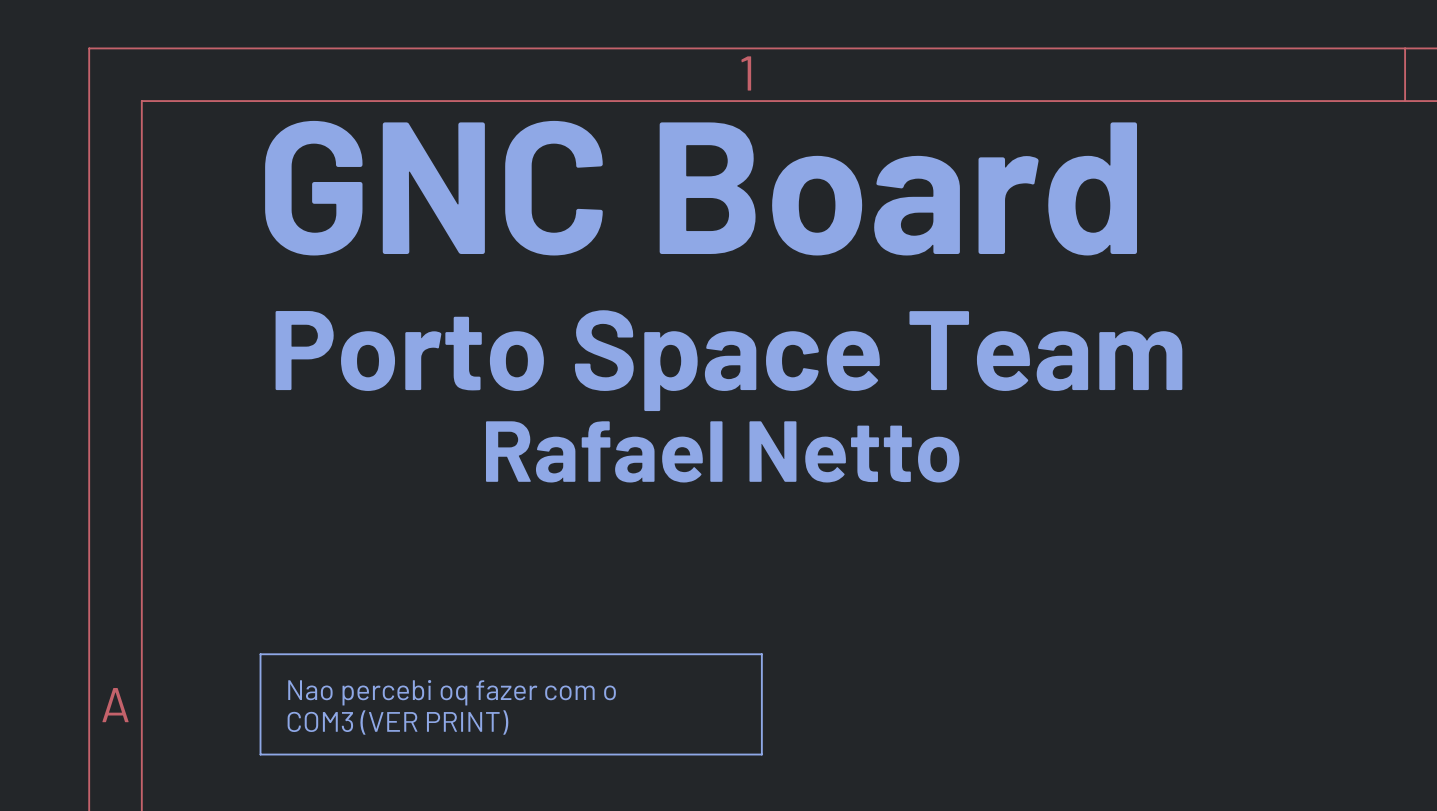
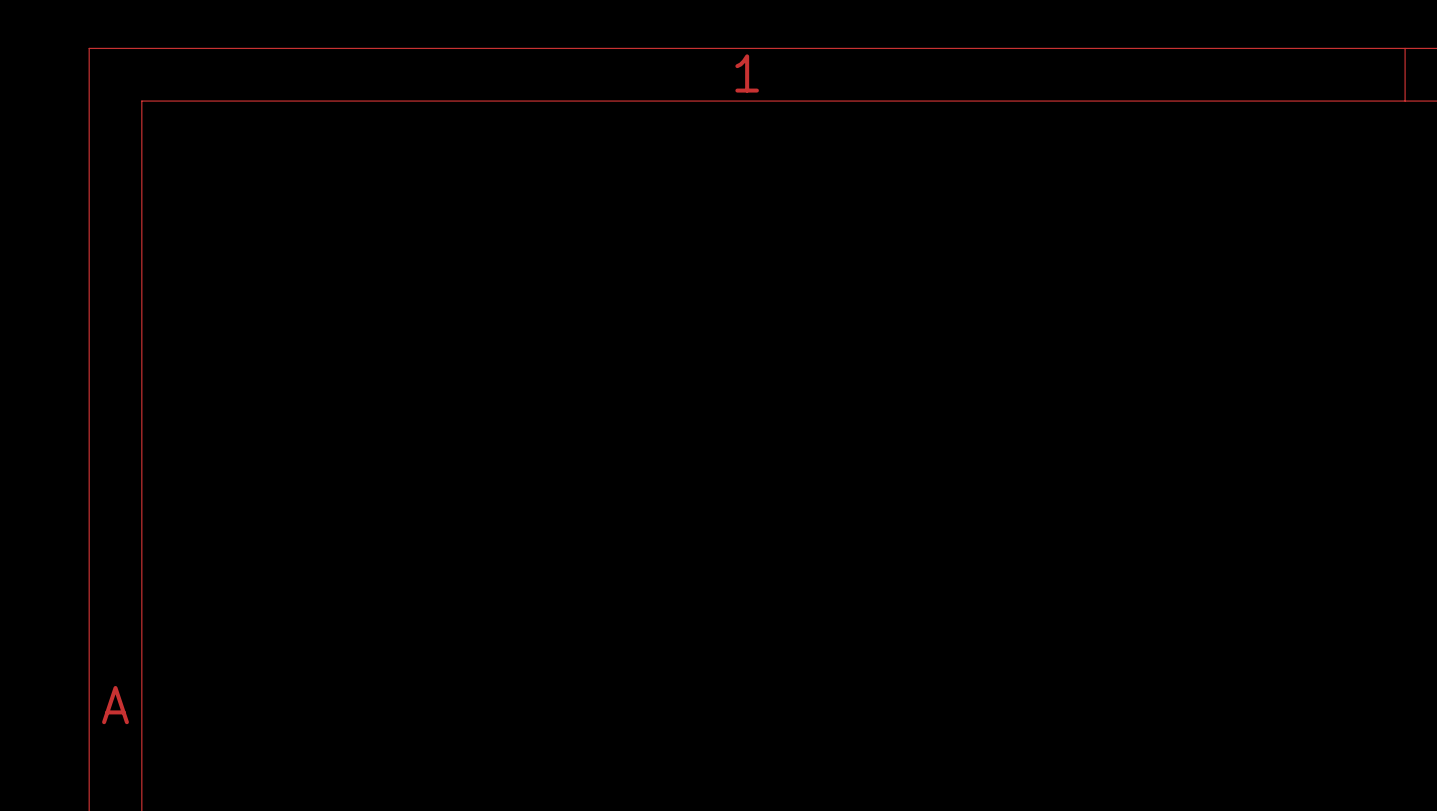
text: GNC Board (701, 188) -> none
text: Porto Space Team (728, 360) -> none
text: Rafael Netto (722, 451) -> none
line: (260, 654) (761, 654) (761, 754) (260, 754) (260, 654) -> none
text: Nao percebi oq fazer com o (452, 692) -> none
text: COM3 (VER PRINT) (397, 722) -> none

